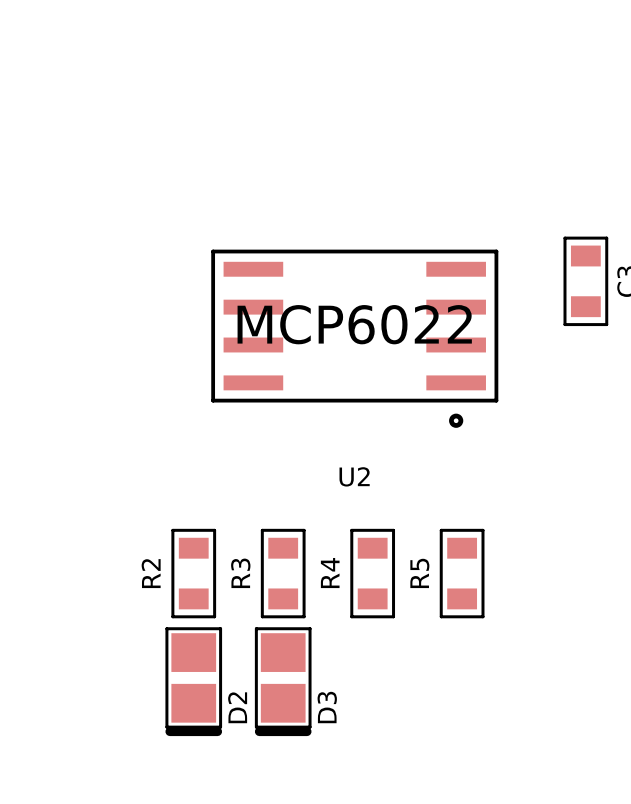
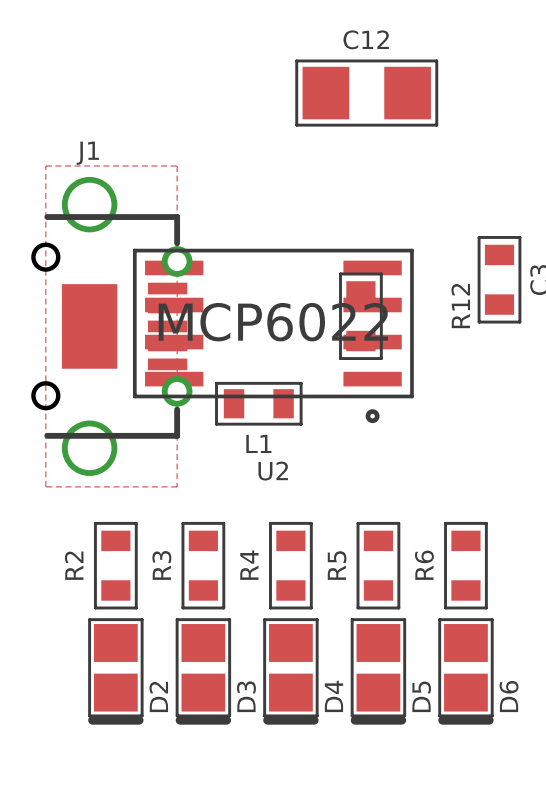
C12: none -> (366, 93)
zone outline: none -> (45, 165) (45, 486) (177, 486) (177, 165) (45, 165)
R12: none -> (360, 316)
J1: none -> (111, 326)
L1: none -> (258, 403)
R6: none -> (465, 565)
D4: none -> (290, 671)
D5: none -> (378, 671)
D6: none -> (465, 671)

